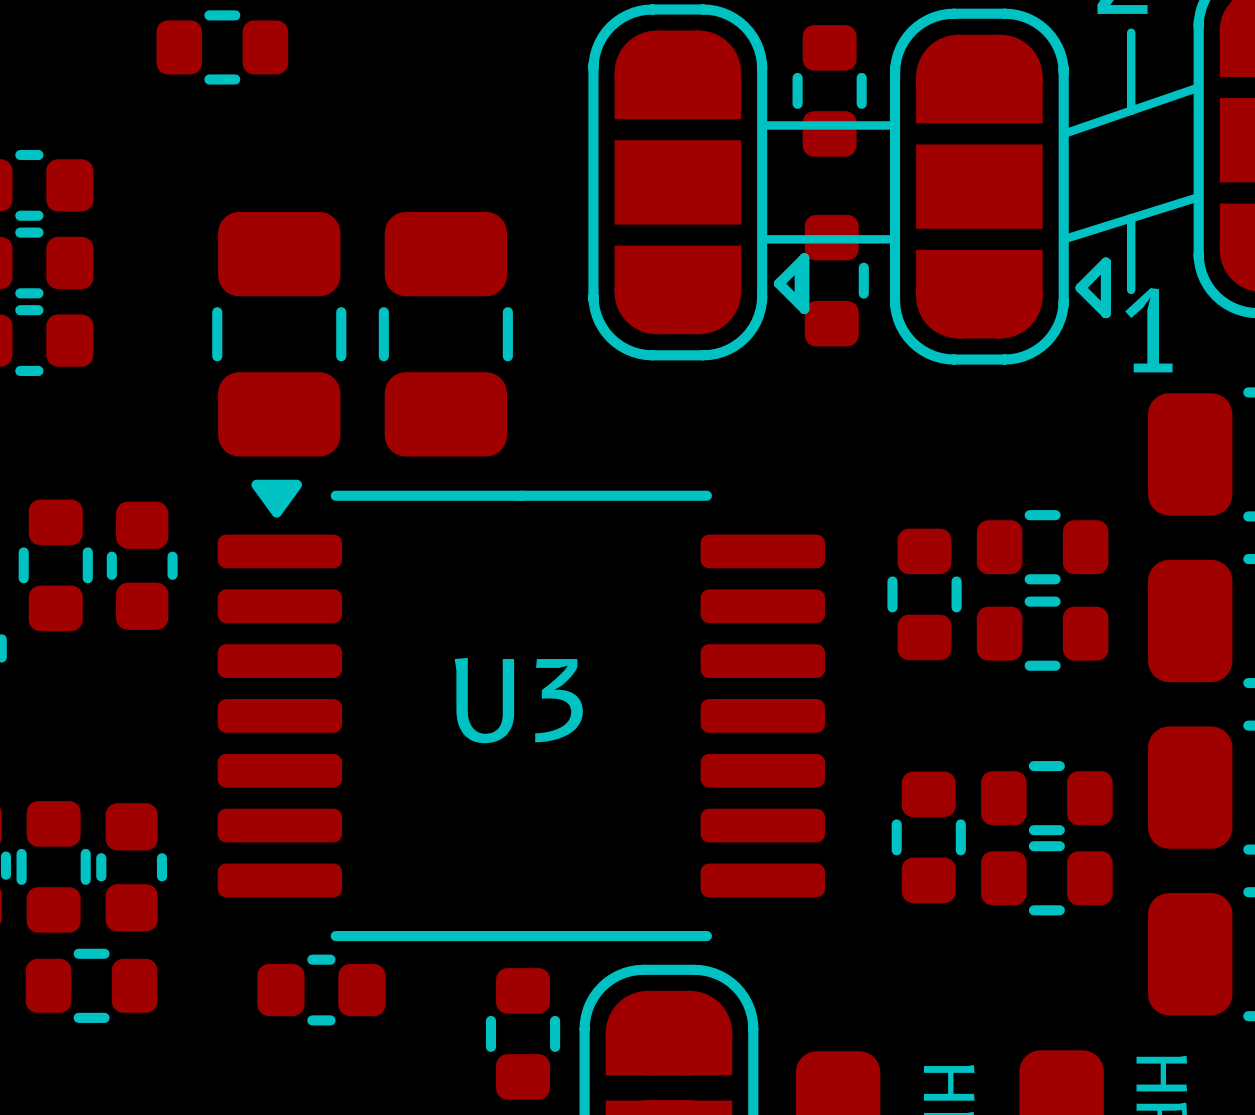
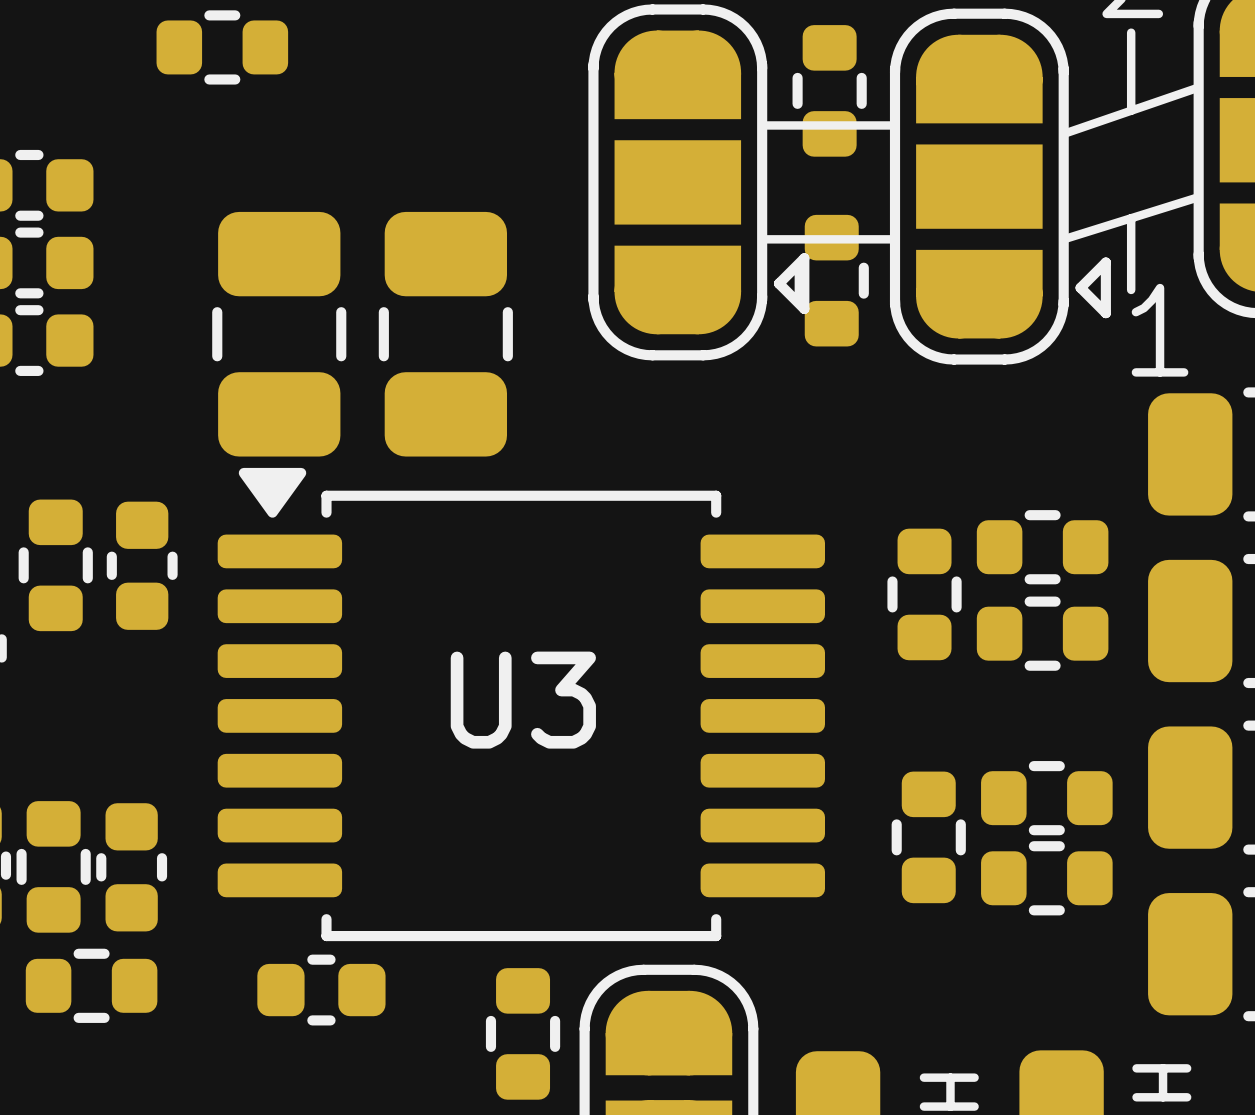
U3 footprint: [217, 479, 826, 942] -> [217, 467, 826, 942]

